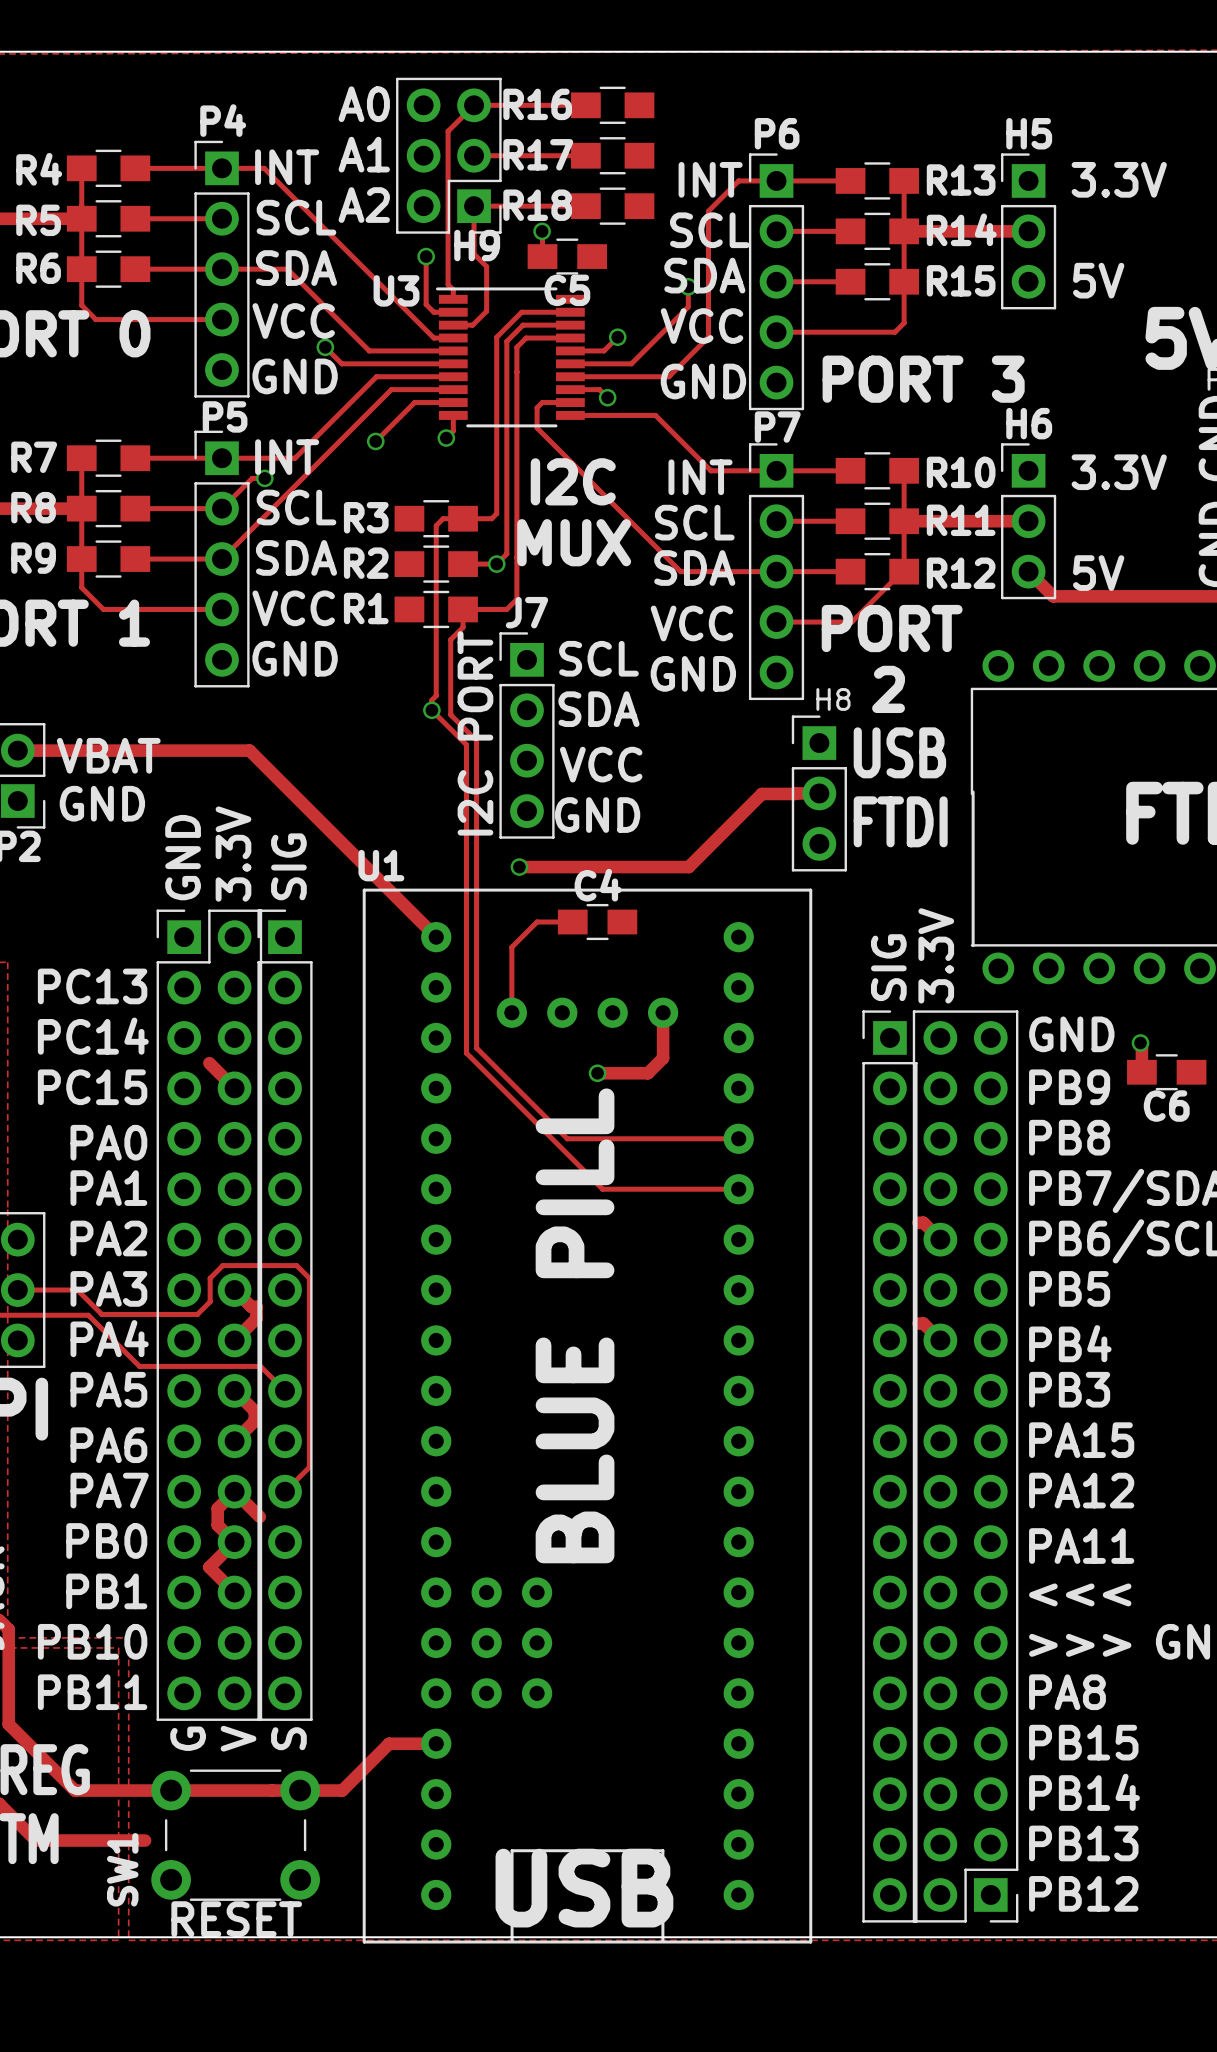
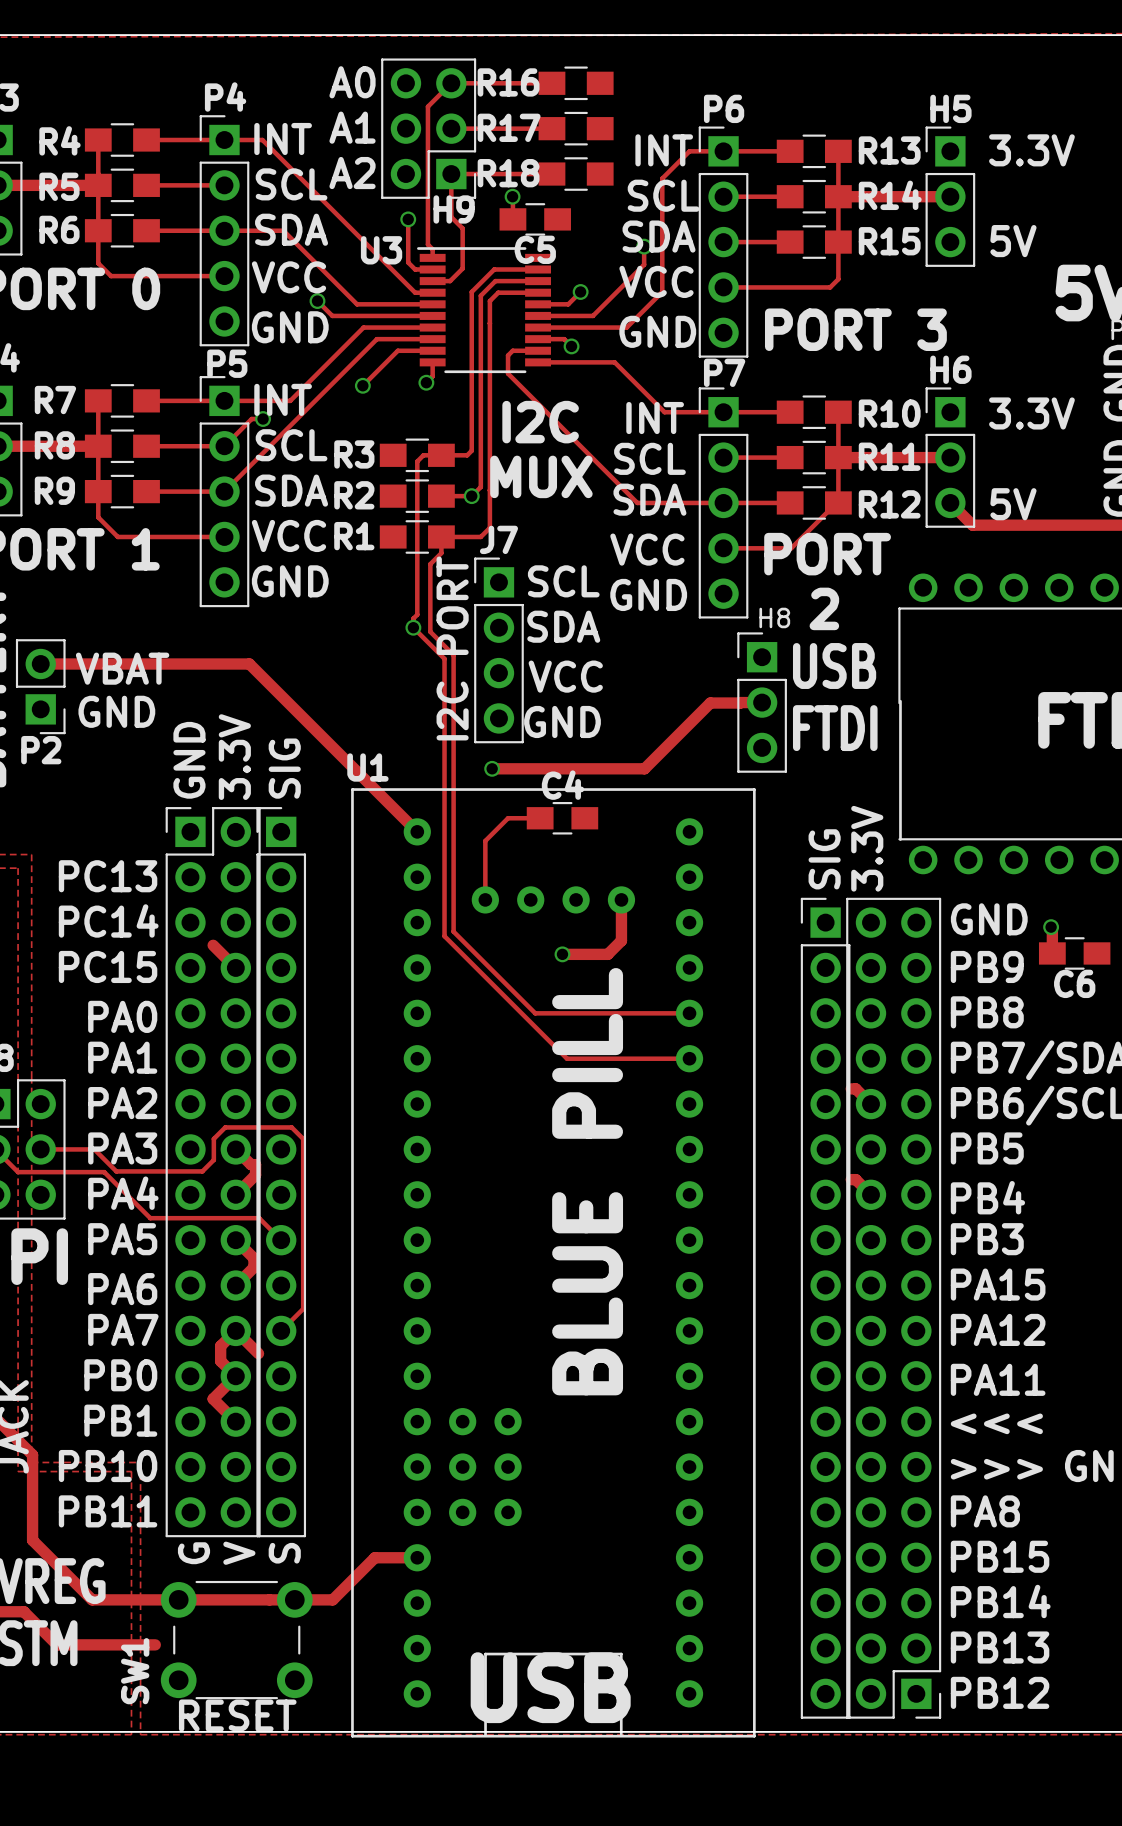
text position: BLUE PILL (575, 1325) -> BLUE PILL (587, 1181)

